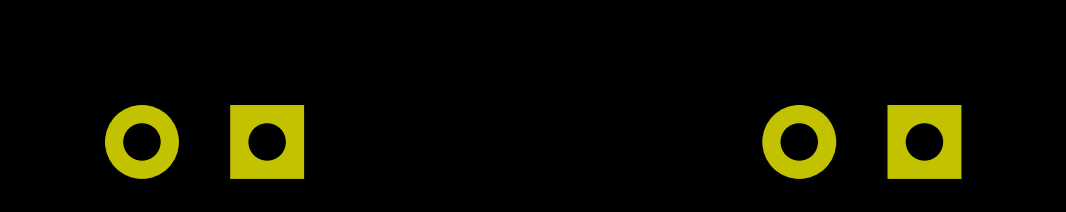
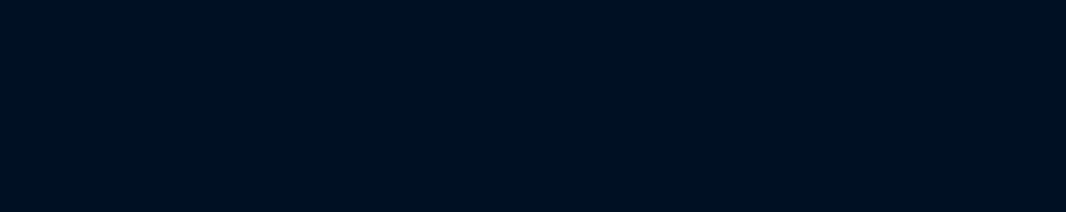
part: (204, 141) -> none
part: (861, 141) -> none

